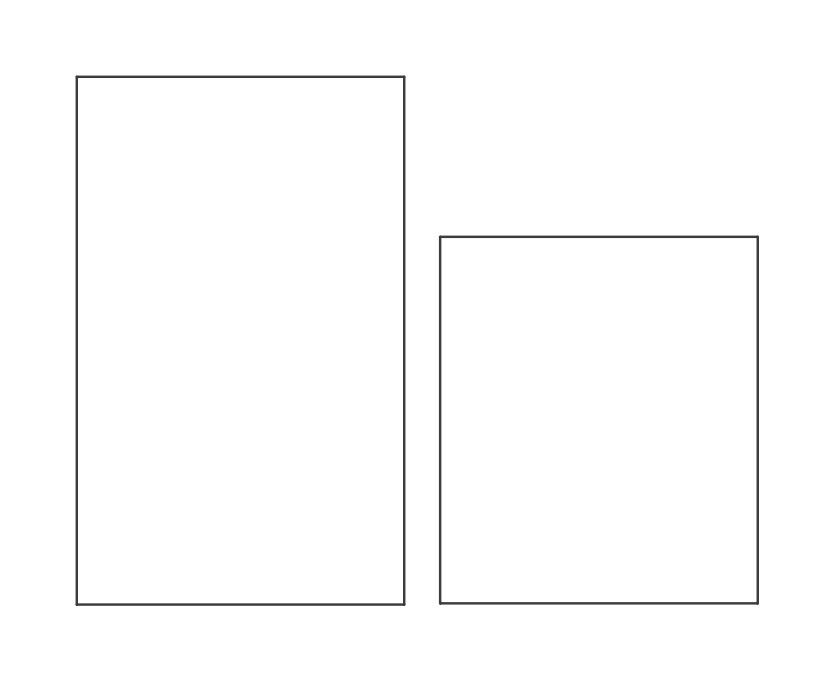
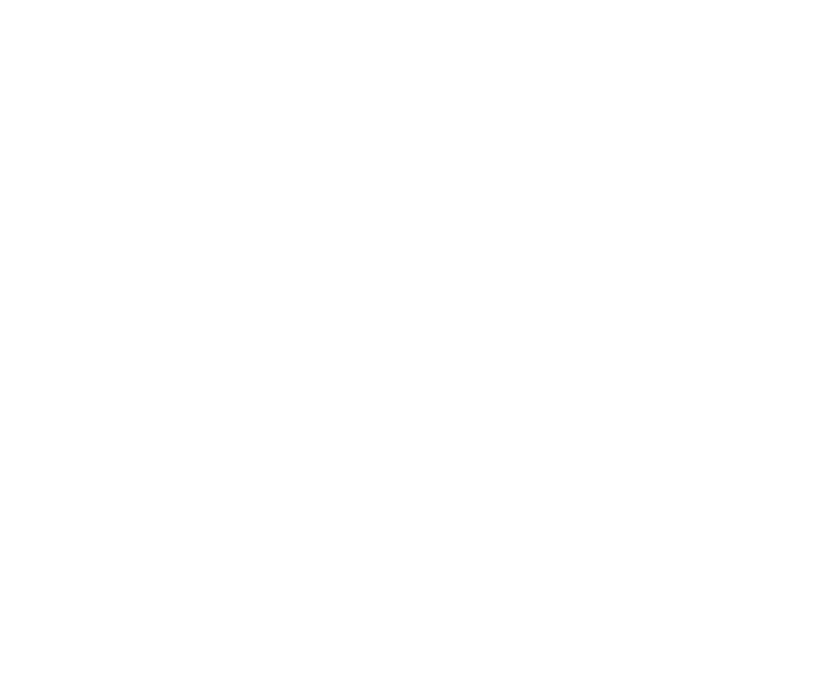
line: (76, 76) (404, 76) (404, 604) (76, 604) (76, 76) -> none
line: (440, 236) (757, 236) (757, 603) (440, 603) (440, 236) -> none

